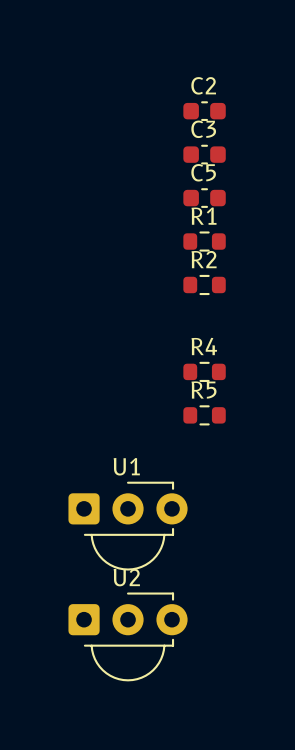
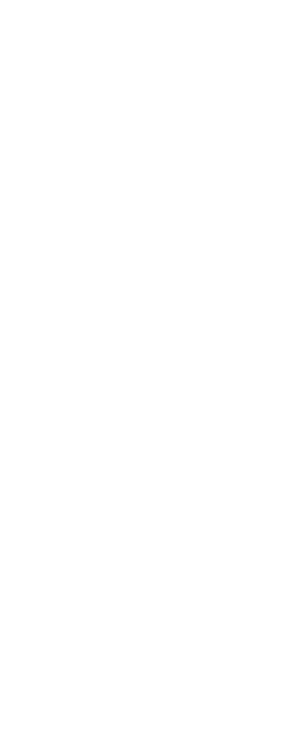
C2: (204, 111) -> none
C3: (204, 154) -> none
C5: (204, 198) -> none
R1: (204, 241) -> none
R2: (204, 284) -> none
R4: (204, 371) -> none
R5: (204, 415) -> none
U1: (128, 526) -> none
U2: (128, 636) -> none

